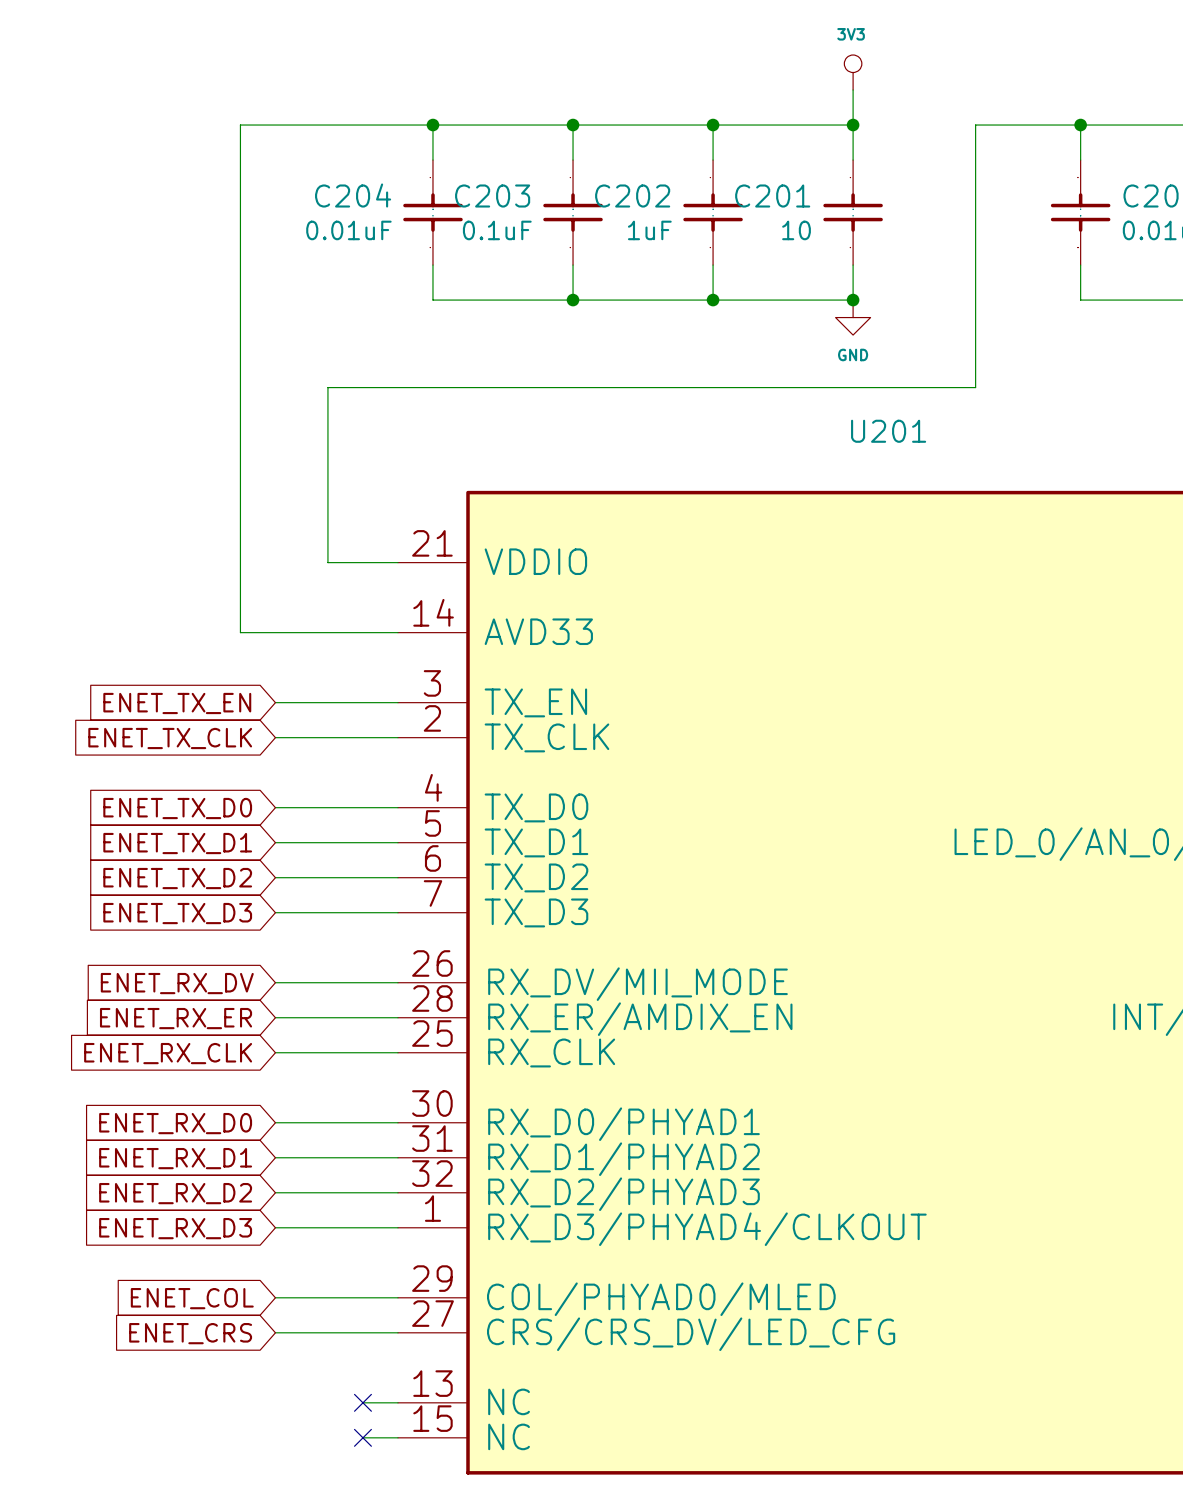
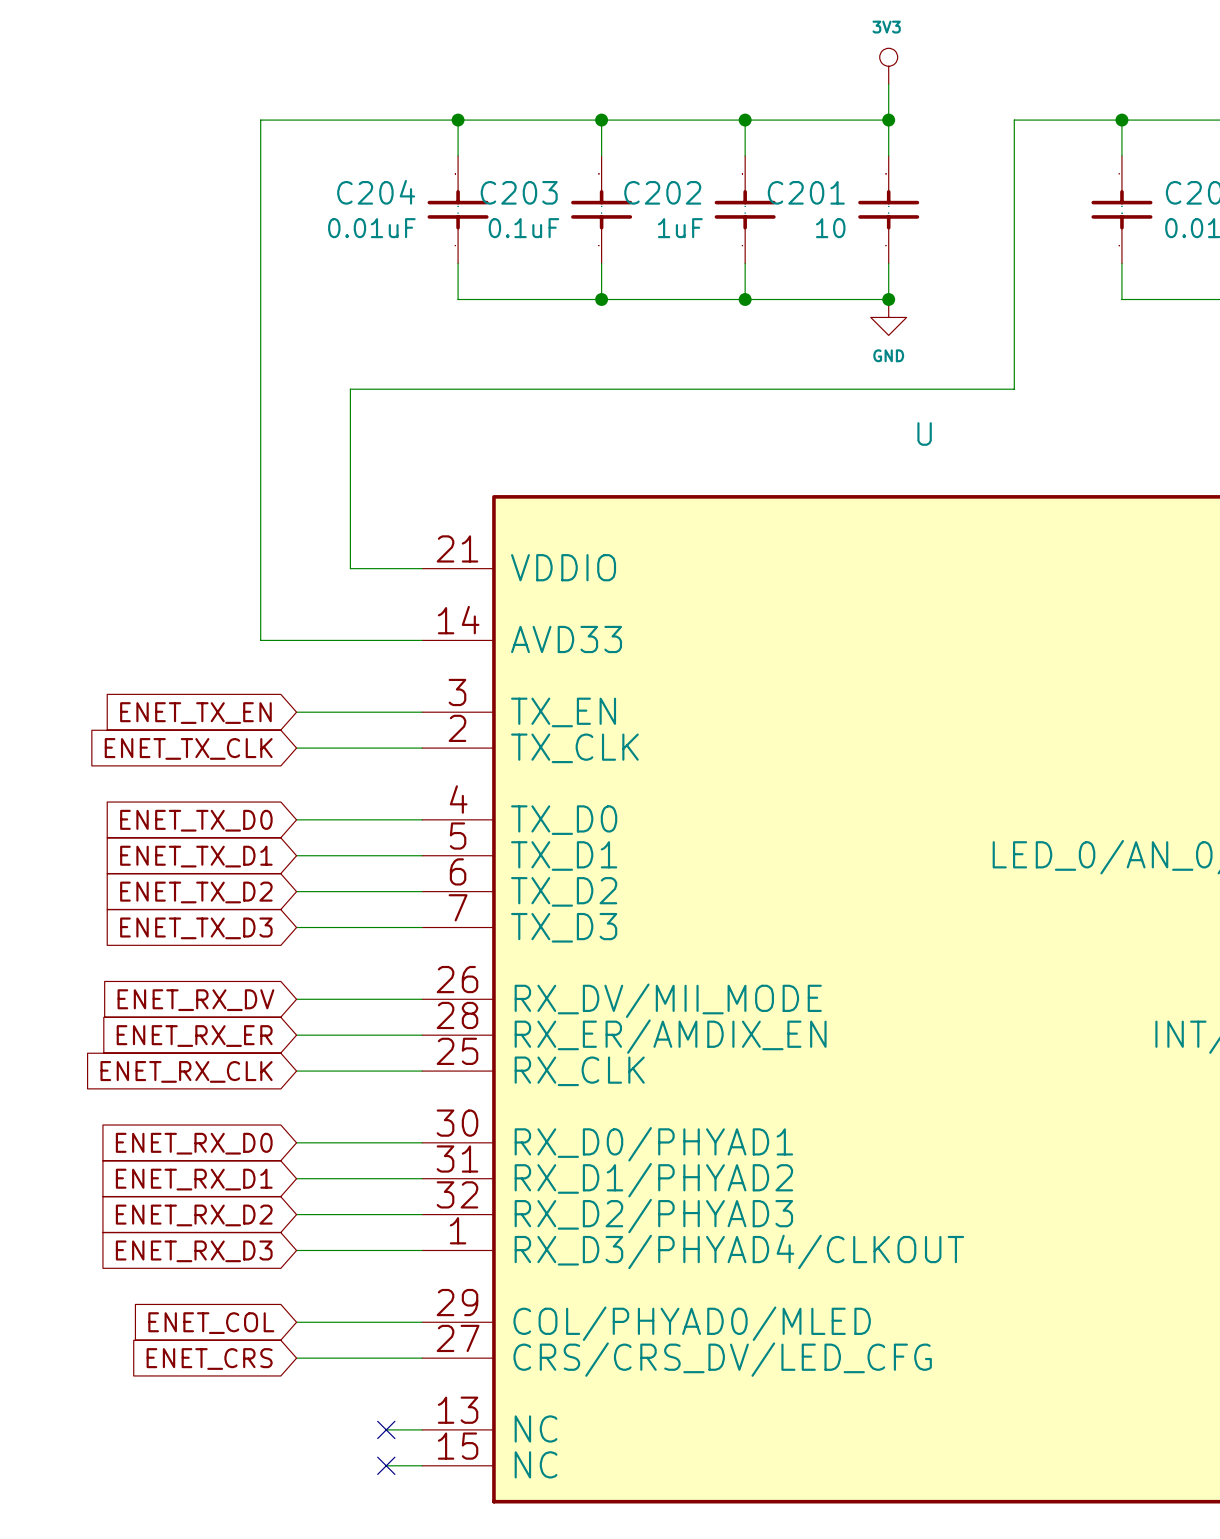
U201 name: U201 (888, 431) -> U (924, 433)

